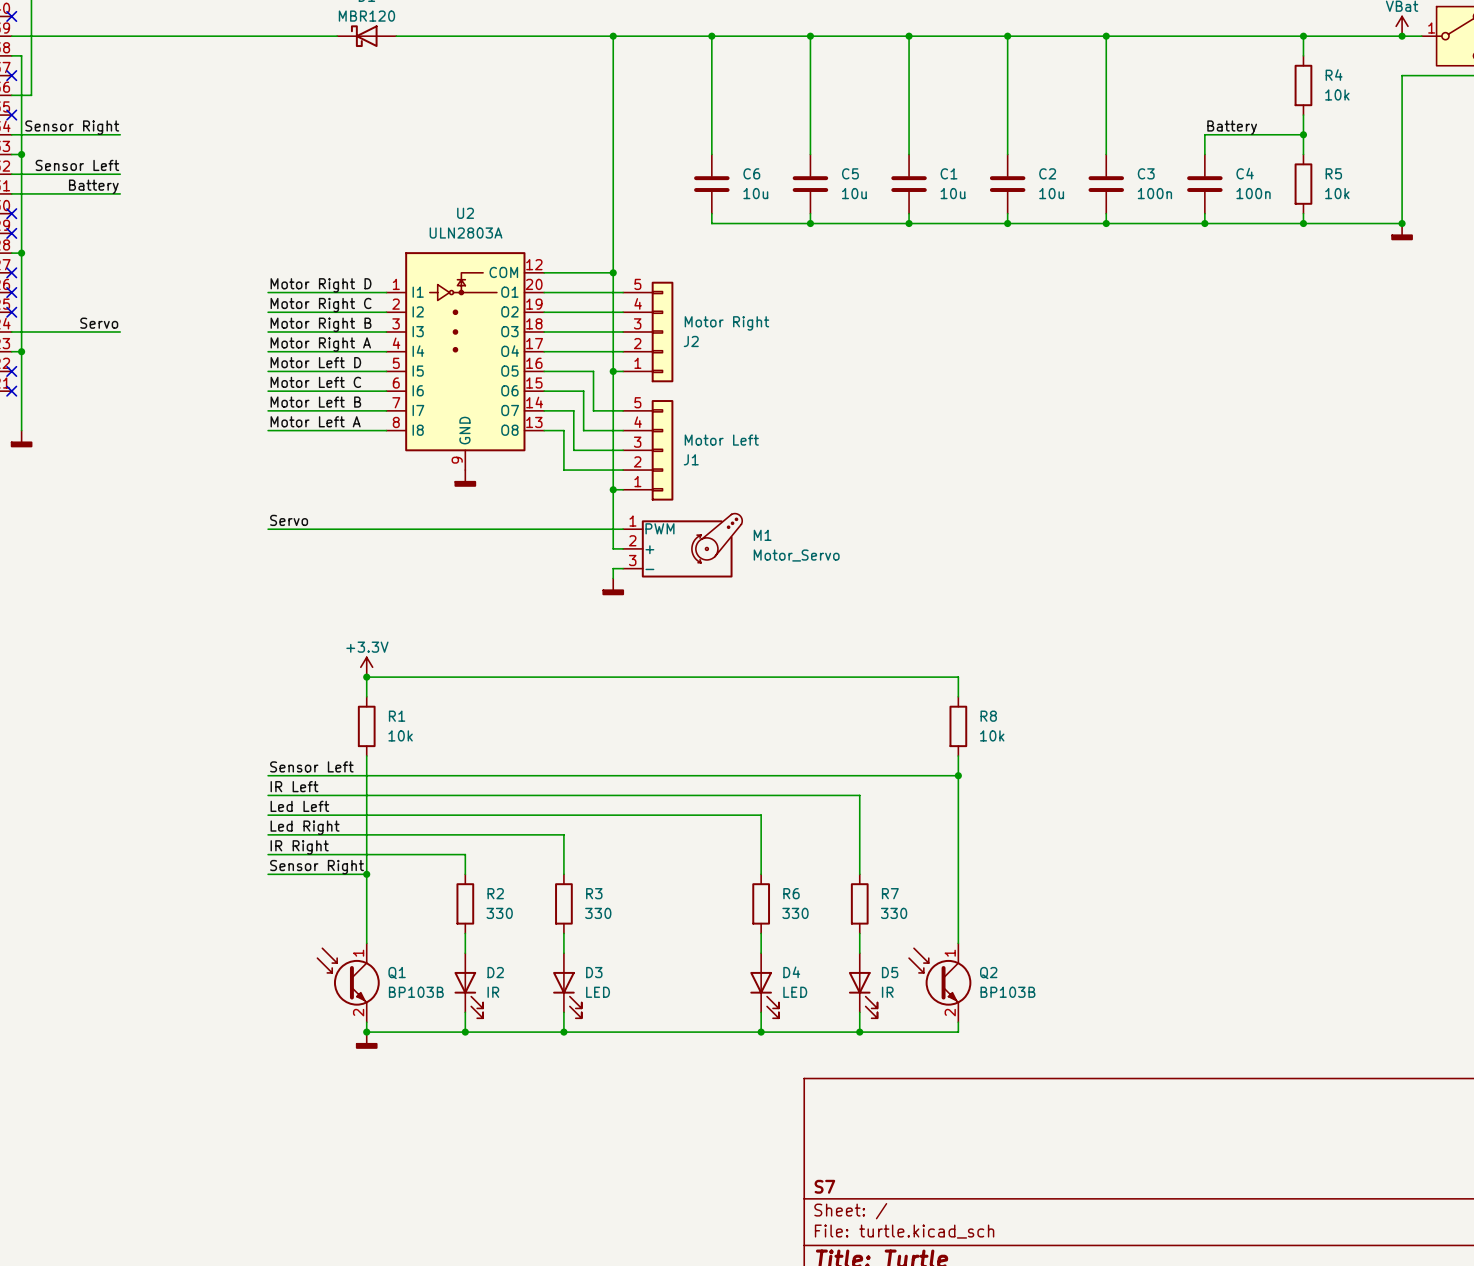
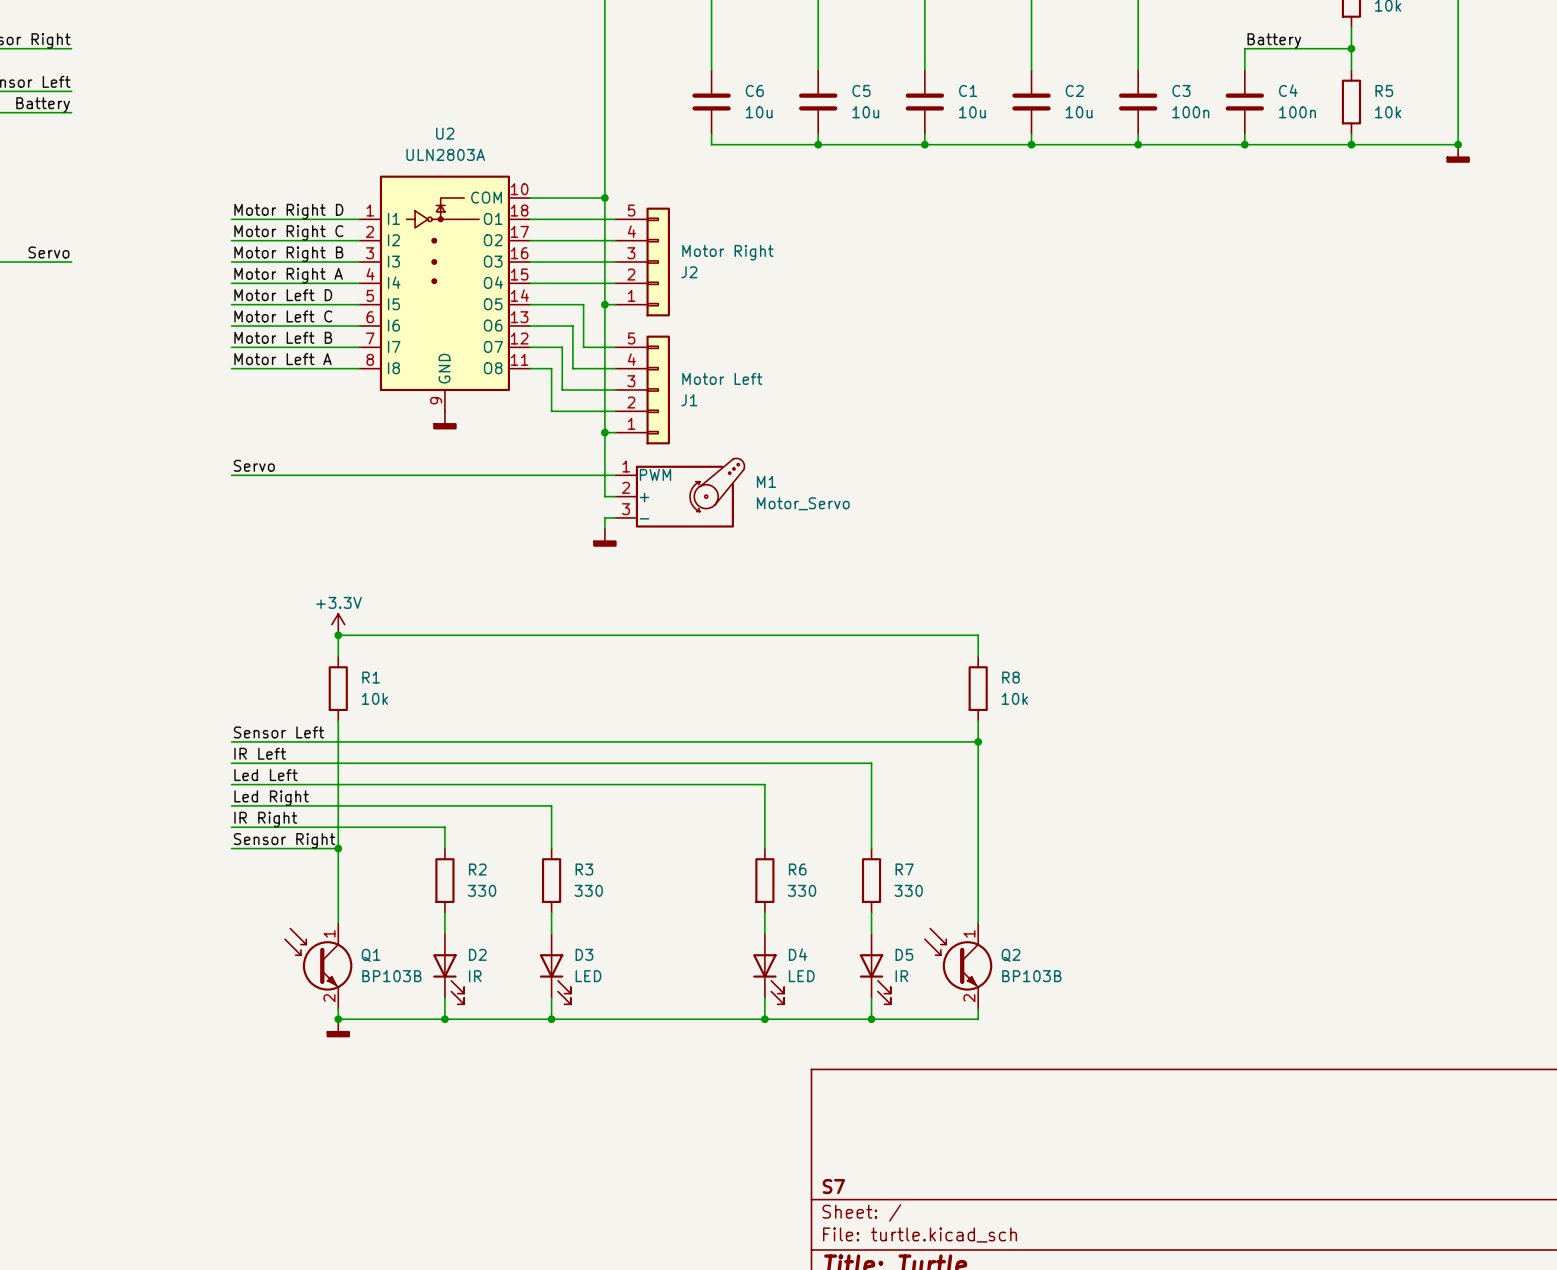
U2 symbol: [386, 252, 545, 471] -> [359, 175, 531, 412]

